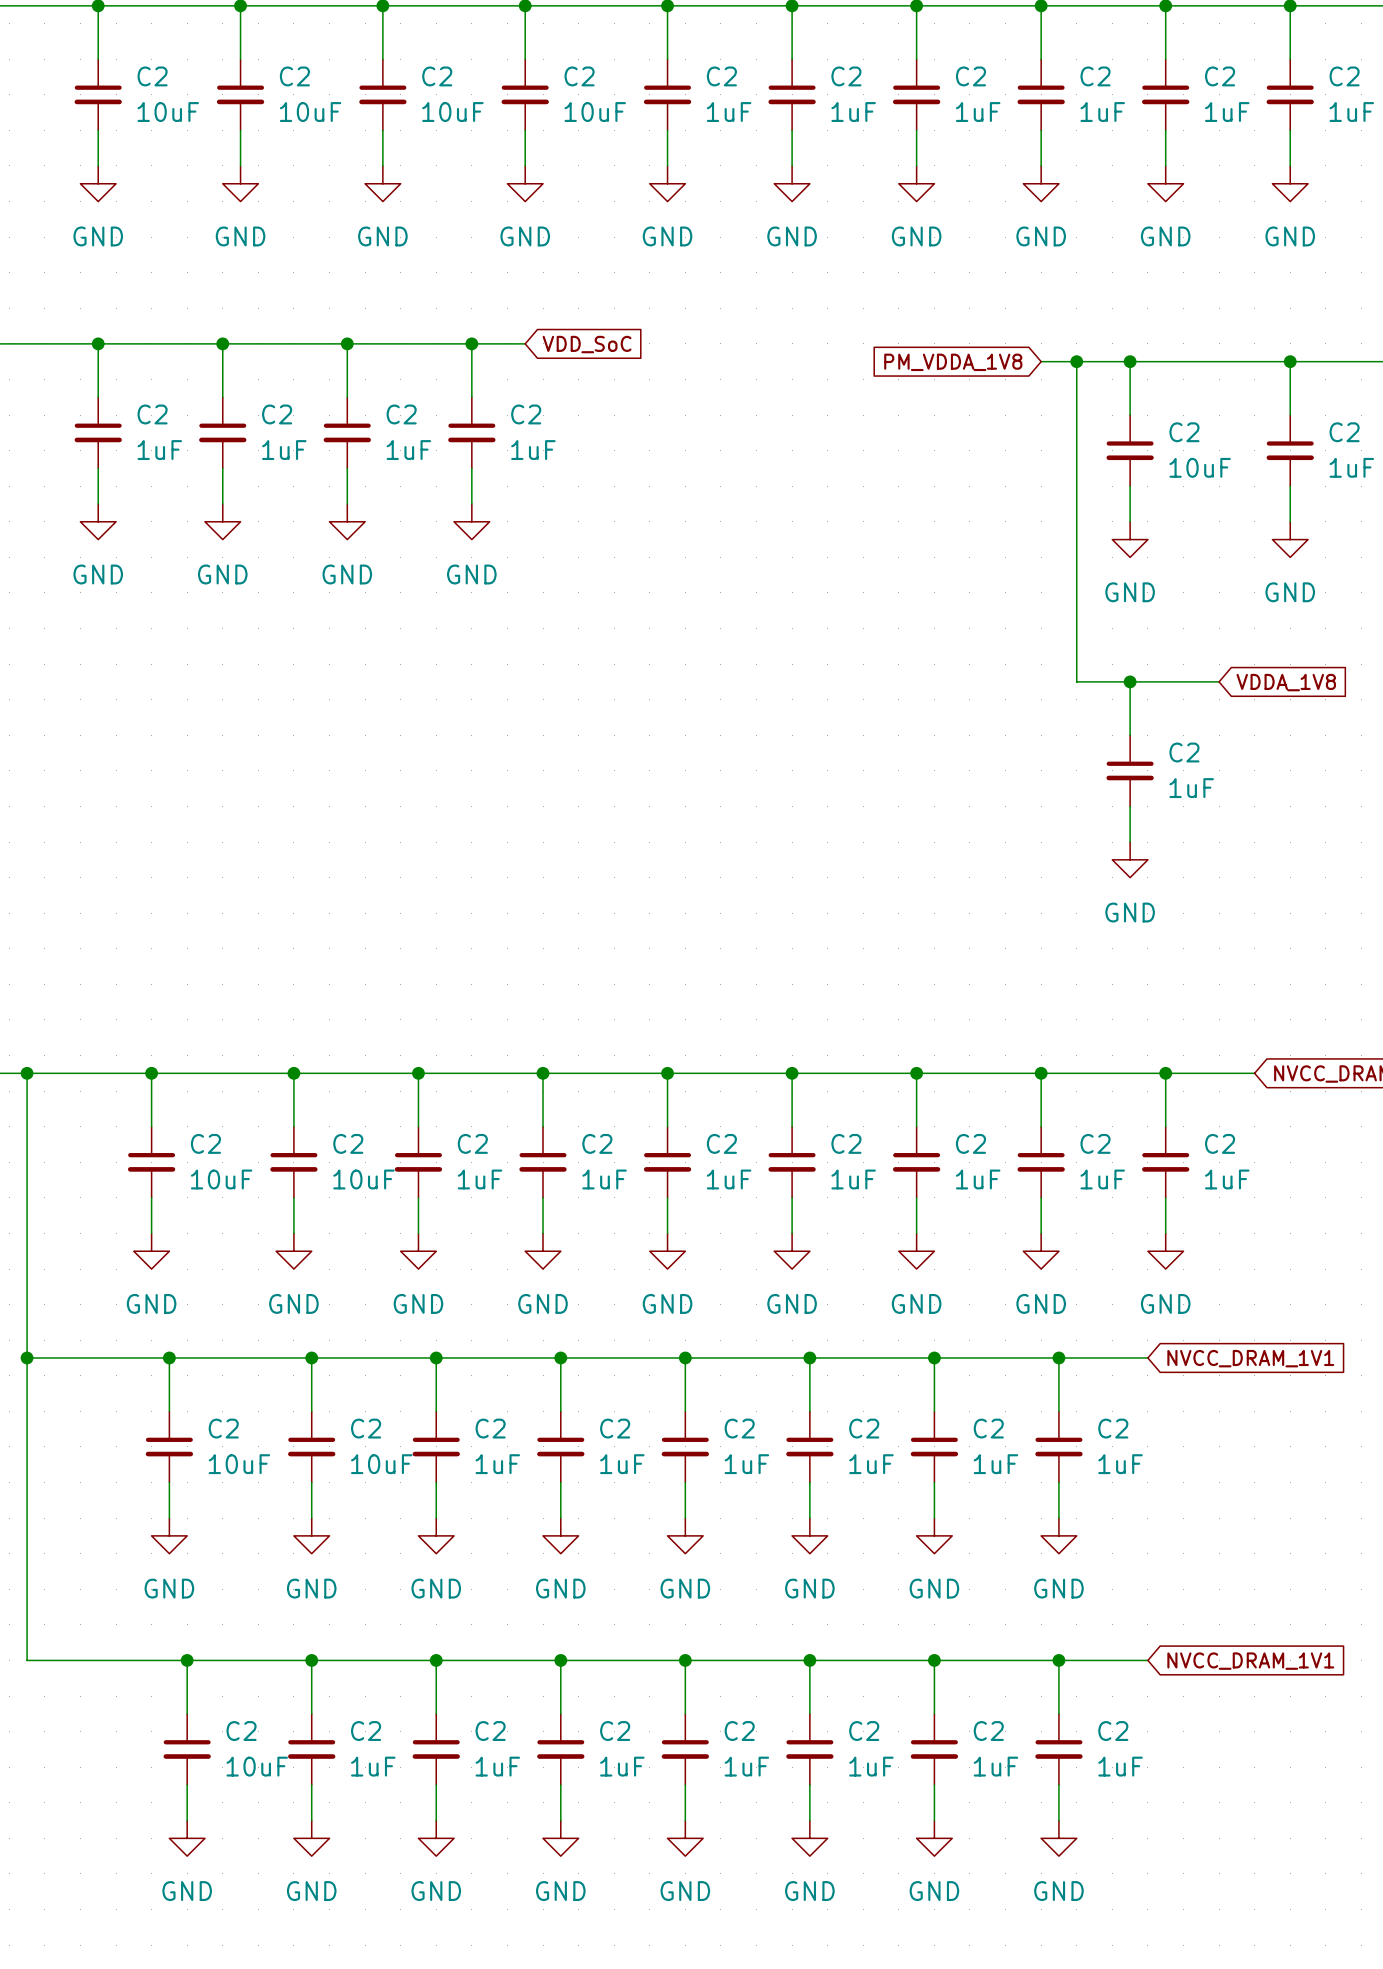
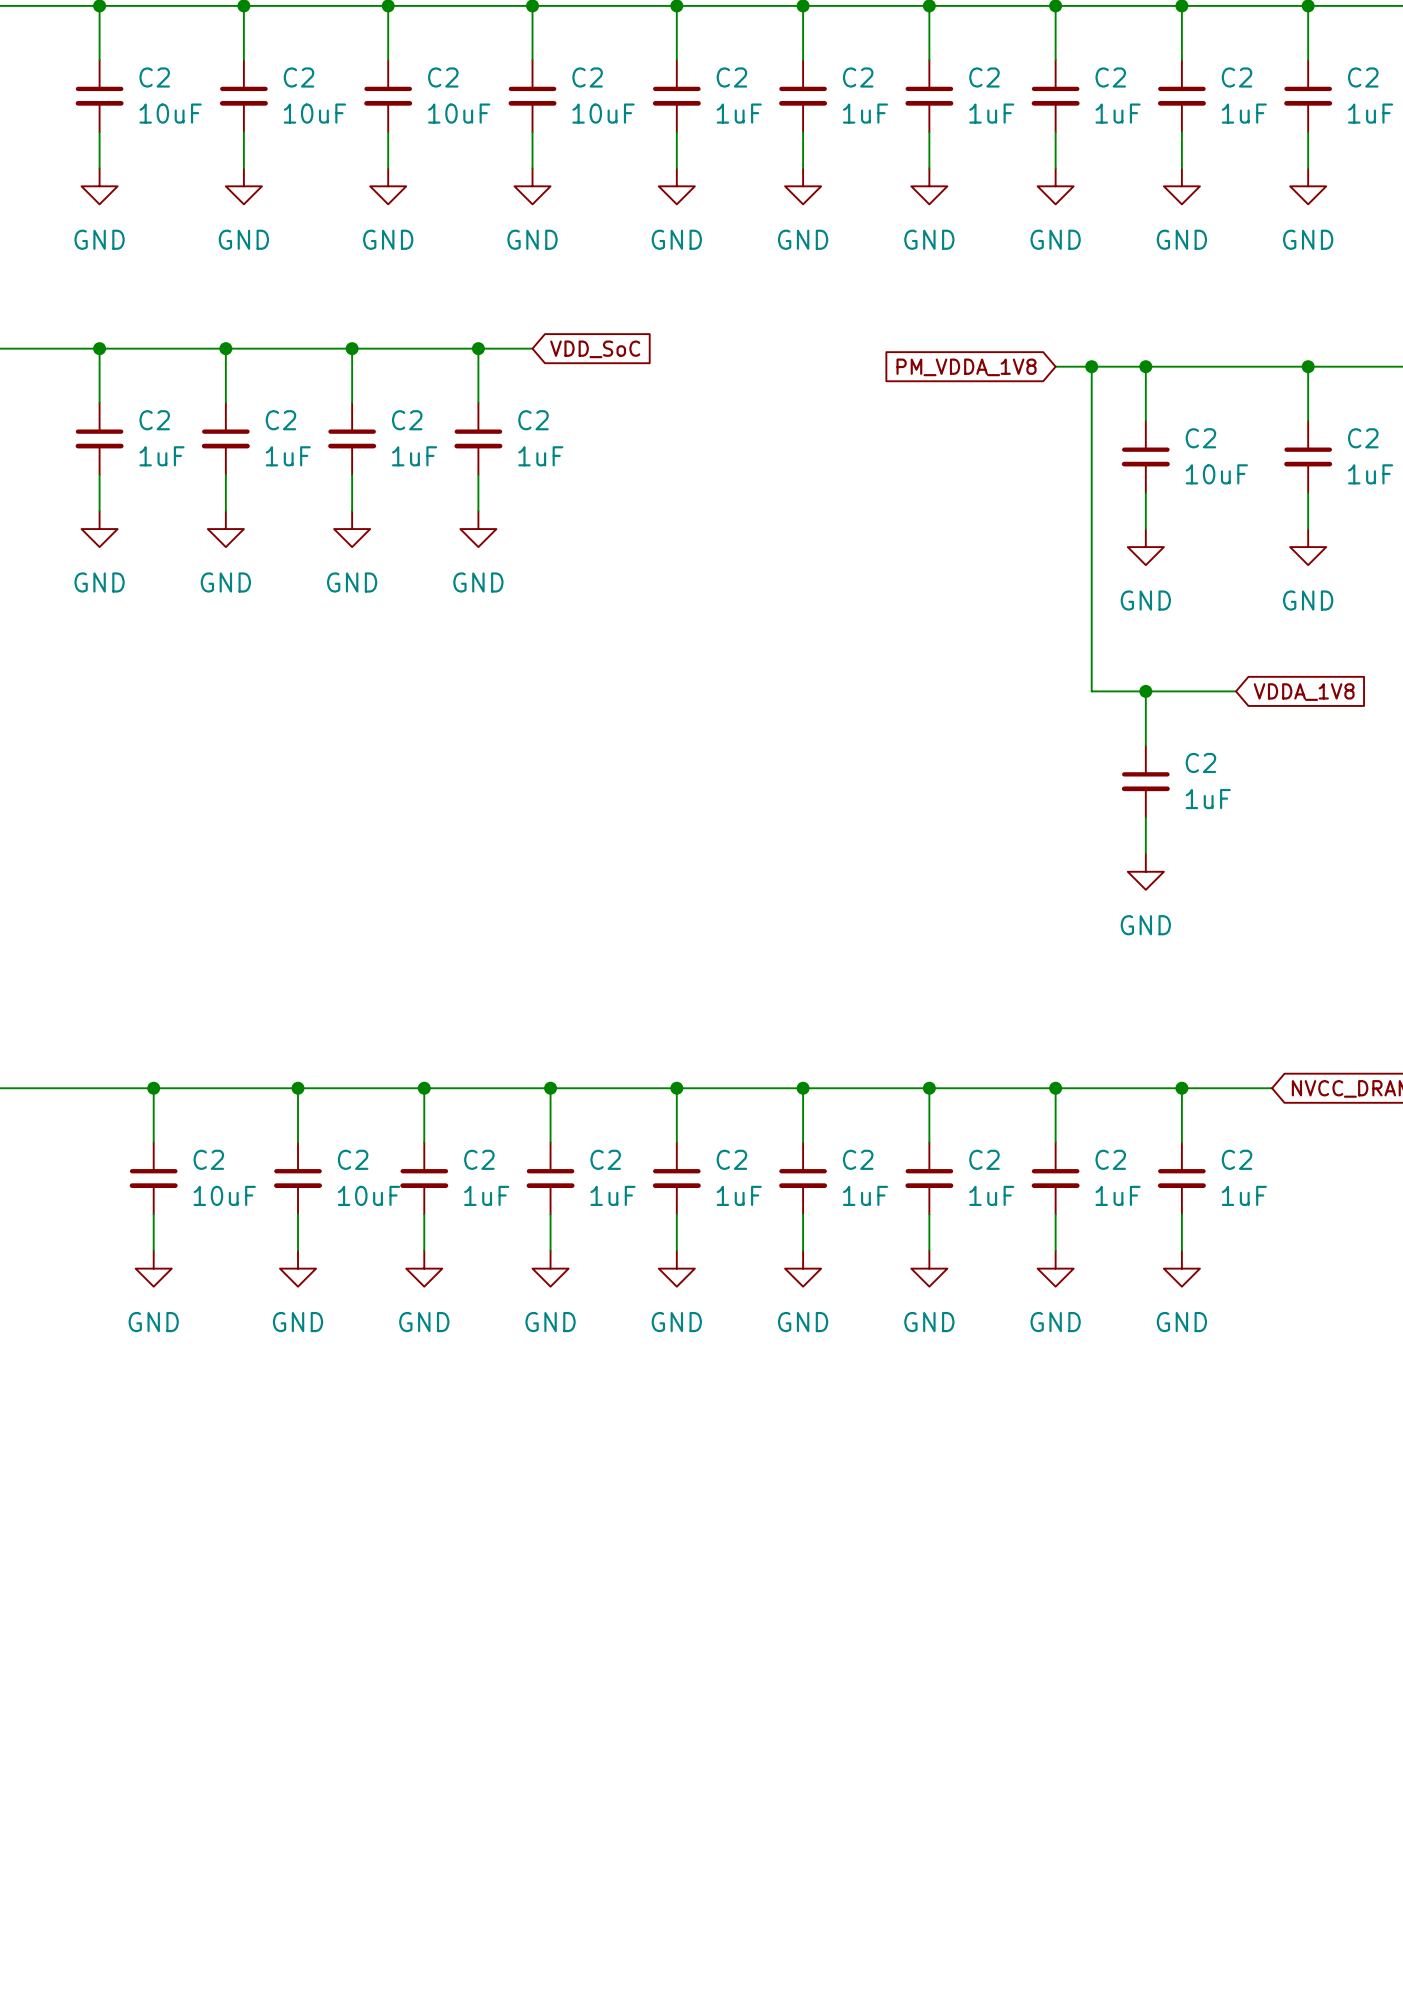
wire: (27, 1073) (27, 1660) (1147, 1660) -> none
junction: (27, 1073) -> none
wire: (27, 1357) (1147, 1357) -> none
junction: (27, 1357) -> none
wire: (169, 1357) (169, 1411) -> none
junction: (169, 1357) -> none
wire: (311, 1357) (311, 1411) -> none
junction: (311, 1357) -> none
wire: (436, 1357) (436, 1411) -> none
junction: (436, 1357) -> none
wire: (560, 1357) (560, 1411) -> none
junction: (560, 1357) -> none
wire: (685, 1357) (685, 1411) -> none
junction: (685, 1357) -> none
wire: (809, 1357) (809, 1411) -> none
junction: (809, 1357) -> none
wire: (934, 1357) (934, 1411) -> none
junction: (934, 1357) -> none
wire: (1058, 1357) (1058, 1411) -> none
junction: (1058, 1357) -> none
global label: NVCC_DRAM_1V1 (1250, 1358) -> none
C2: 10uF (169, 1446) -> none
C2: 10uF (311, 1446) -> none
C2: 1uF (436, 1446) -> none
C2: 1uF (560, 1446) -> none
C2: 1uF (685, 1446) -> none
C2: 1uF (809, 1446) -> none
C2: 1uF (934, 1446) -> none
C2: 1uF (1058, 1446) -> none
wire: (169, 1482) (169, 1518) -> none
wire: (311, 1482) (311, 1518) -> none
wire: (436, 1482) (436, 1518) -> none
wire: (560, 1482) (560, 1518) -> none
wire: (685, 1482) (685, 1518) -> none
wire: (809, 1482) (809, 1518) -> none
wire: (934, 1482) (934, 1518) -> none
wire: (1058, 1482) (1058, 1518) -> none
power symbol: GND (169, 1535) -> none
power symbol: GND (311, 1535) -> none
power symbol: GND (436, 1535) -> none
power symbol: GND (560, 1535) -> none
power symbol: GND (685, 1535) -> none
power symbol: GND (809, 1535) -> none
power symbol: GND (934, 1535) -> none
power symbol: GND (1058, 1535) -> none
wire: (187, 1660) (187, 1713) -> none
junction: (187, 1660) -> none
wire: (311, 1660) (311, 1713) -> none
junction: (311, 1660) -> none
wire: (436, 1660) (436, 1713) -> none
junction: (436, 1660) -> none
wire: (560, 1660) (560, 1713) -> none
junction: (560, 1660) -> none
wire: (685, 1660) (685, 1713) -> none
junction: (685, 1660) -> none
wire: (809, 1660) (809, 1713) -> none
junction: (809, 1660) -> none
wire: (934, 1660) (934, 1713) -> none
junction: (934, 1660) -> none
wire: (1058, 1660) (1058, 1713) -> none
junction: (1058, 1660) -> none
global label: NVCC_DRAM_1V1 (1250, 1661) -> none
C2: 10uF (187, 1749) -> none
C2: 1uF (311, 1749) -> none
C2: 1uF (436, 1749) -> none
C2: 1uF (560, 1749) -> none
C2: 1uF (685, 1749) -> none
C2: 1uF (809, 1749) -> none
C2: 1uF (934, 1749) -> none
C2: 1uF (1058, 1749) -> none
wire: (187, 1784) (187, 1820) -> none
wire: (311, 1784) (311, 1820) -> none
wire: (436, 1784) (436, 1820) -> none
wire: (560, 1784) (560, 1820) -> none
wire: (685, 1784) (685, 1820) -> none
wire: (809, 1784) (809, 1820) -> none
wire: (934, 1784) (934, 1820) -> none
wire: (1058, 1784) (1058, 1820) -> none
power symbol: GND (187, 1838) -> none
power symbol: GND (311, 1838) -> none
power symbol: GND (436, 1838) -> none
power symbol: GND (560, 1838) -> none
power symbol: GND (685, 1838) -> none
power symbol: GND (809, 1838) -> none
power symbol: GND (934, 1838) -> none
power symbol: GND (1058, 1838) -> none

